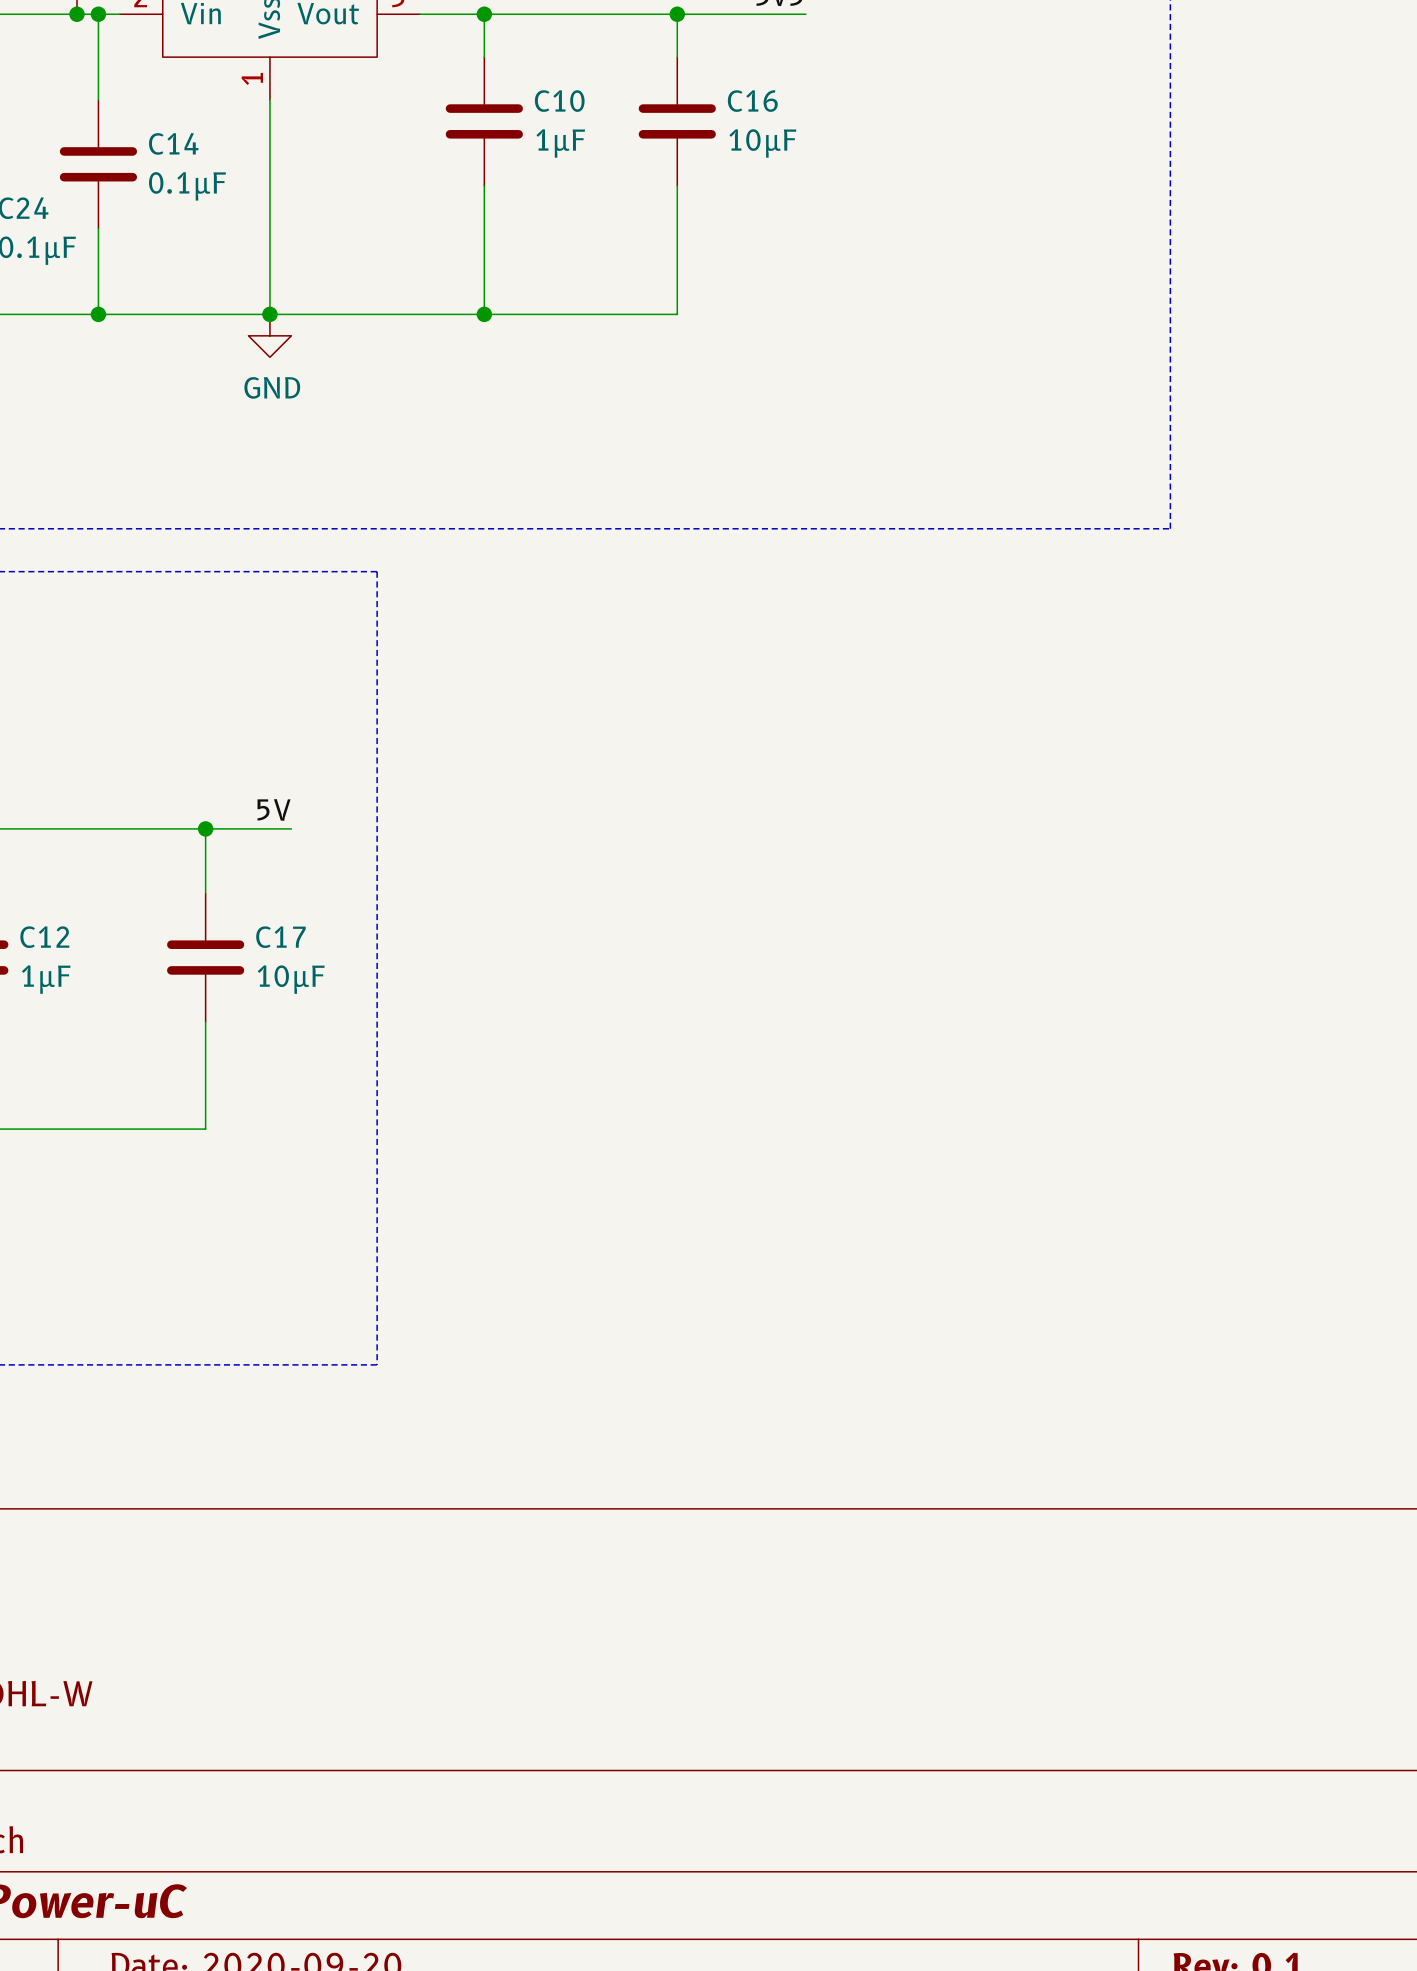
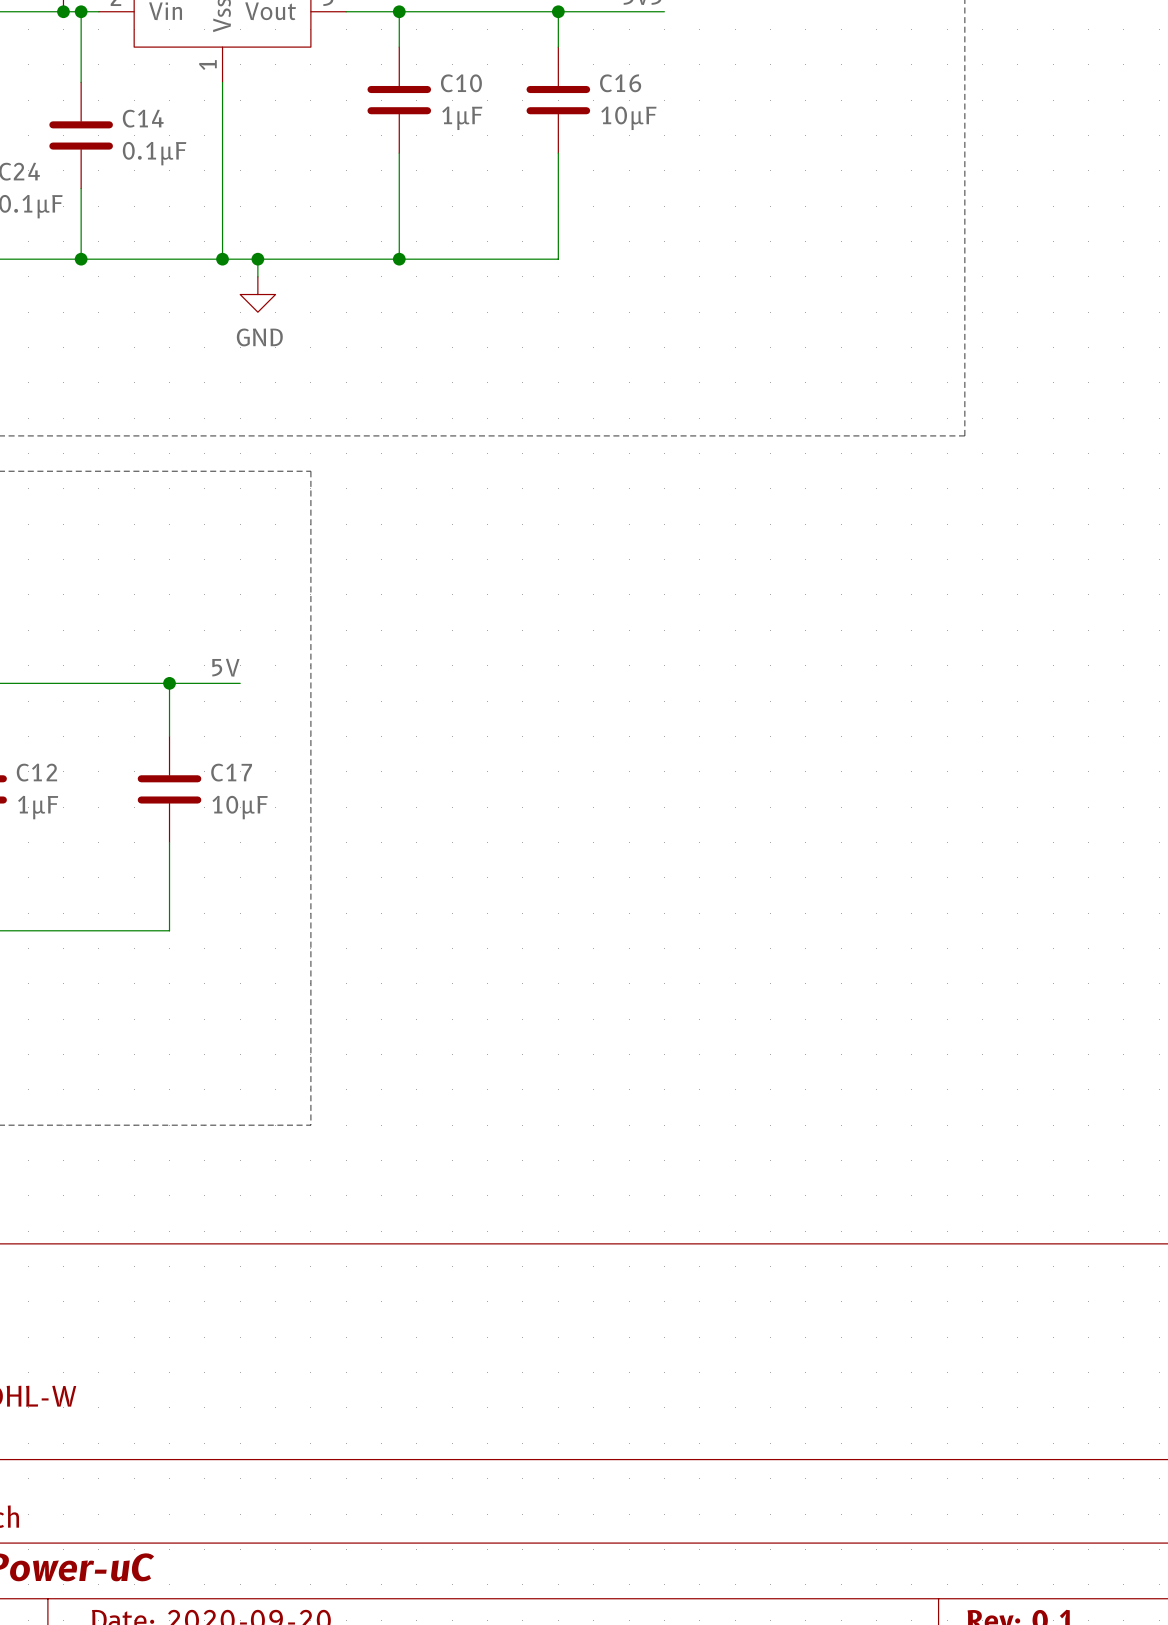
wire: none -> (257, 259) (257, 276)
junction: none -> (257, 259)
power symbol position: GND (269, 335) -> GND (257, 294)

